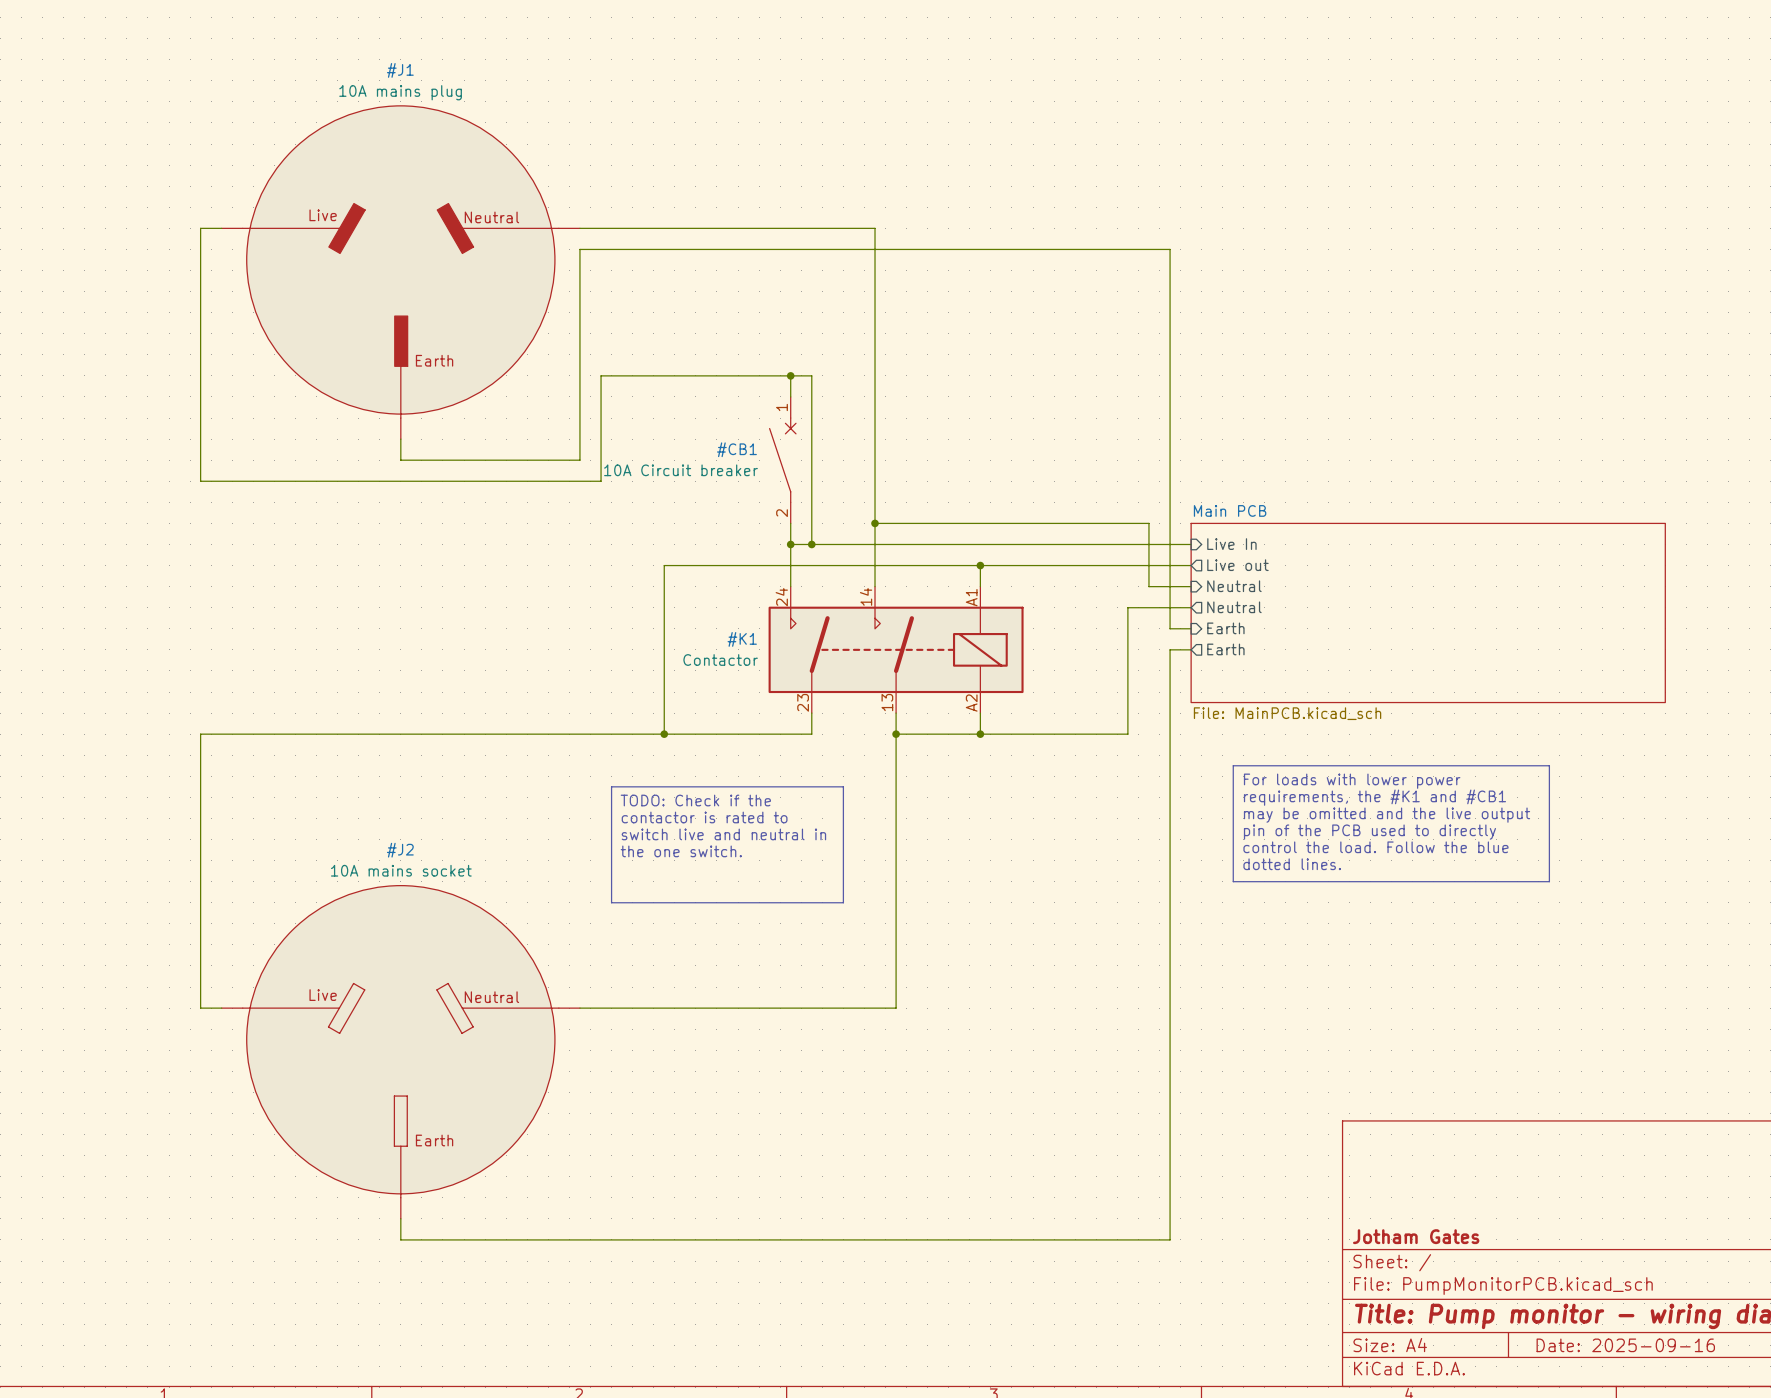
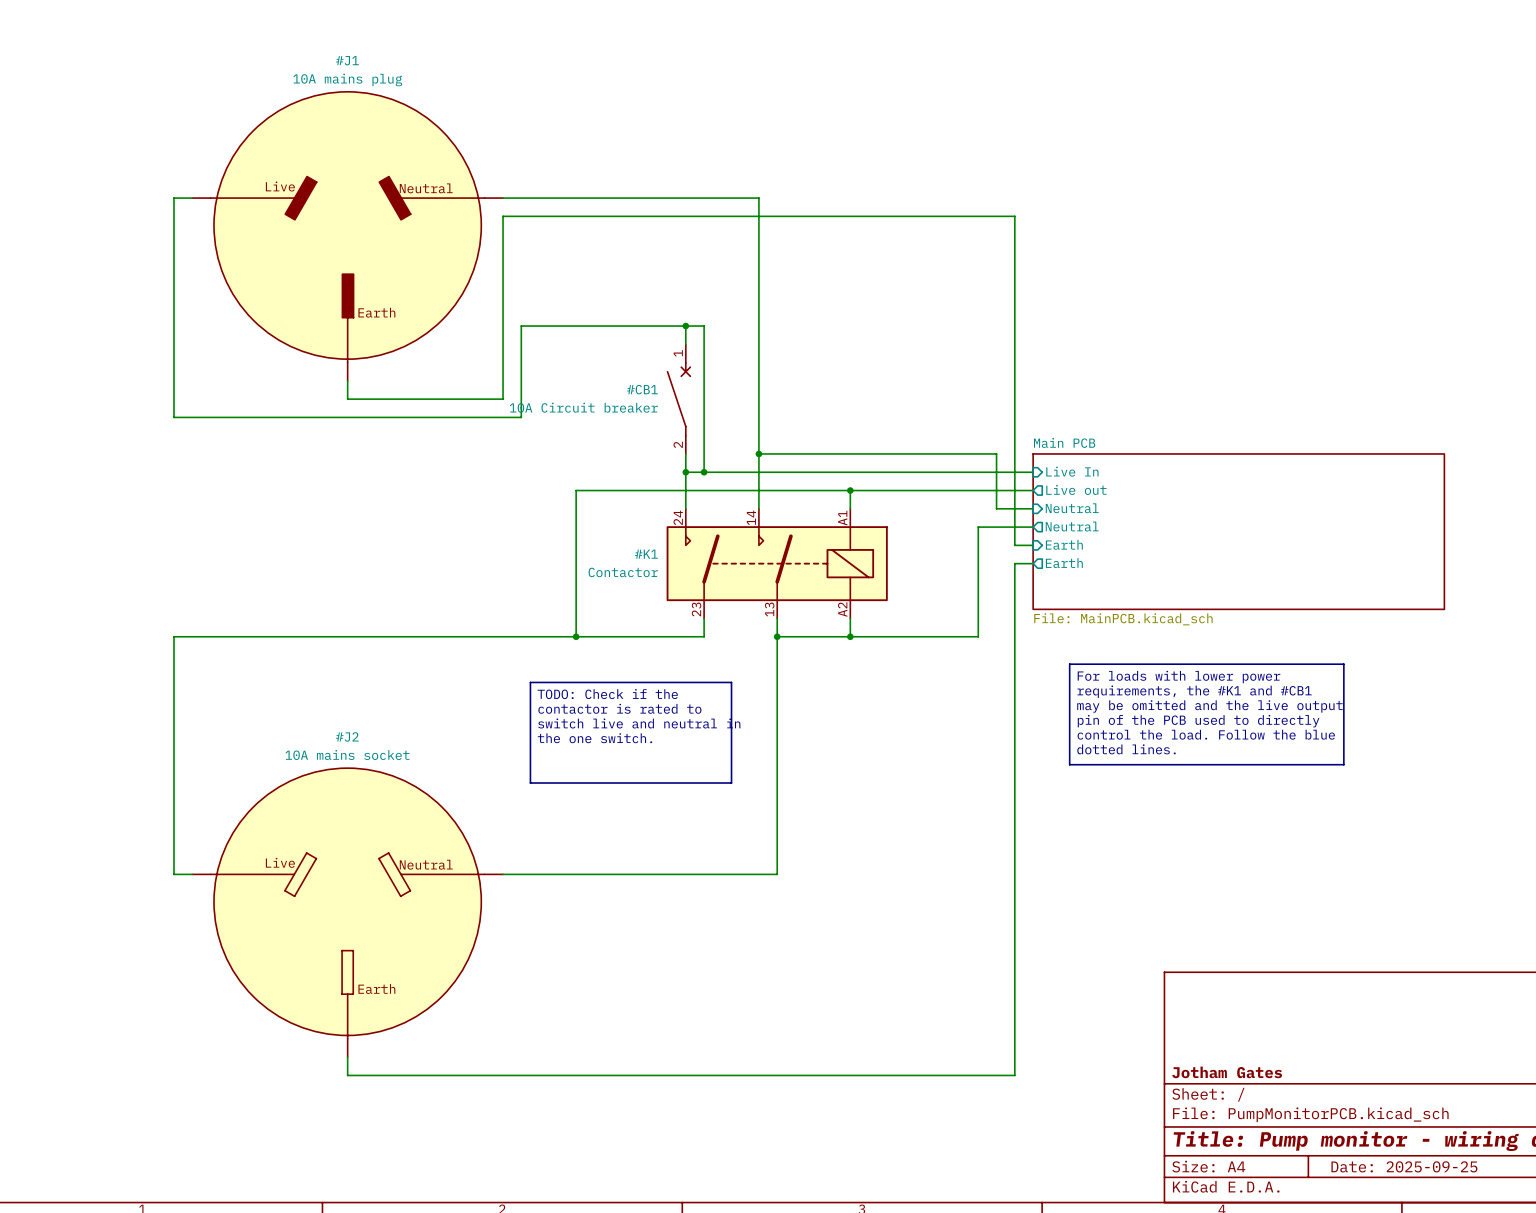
title block: Date: 2025-09-16 (1625, 1345) -> Date: 2025-09-25 (1404, 1166)

